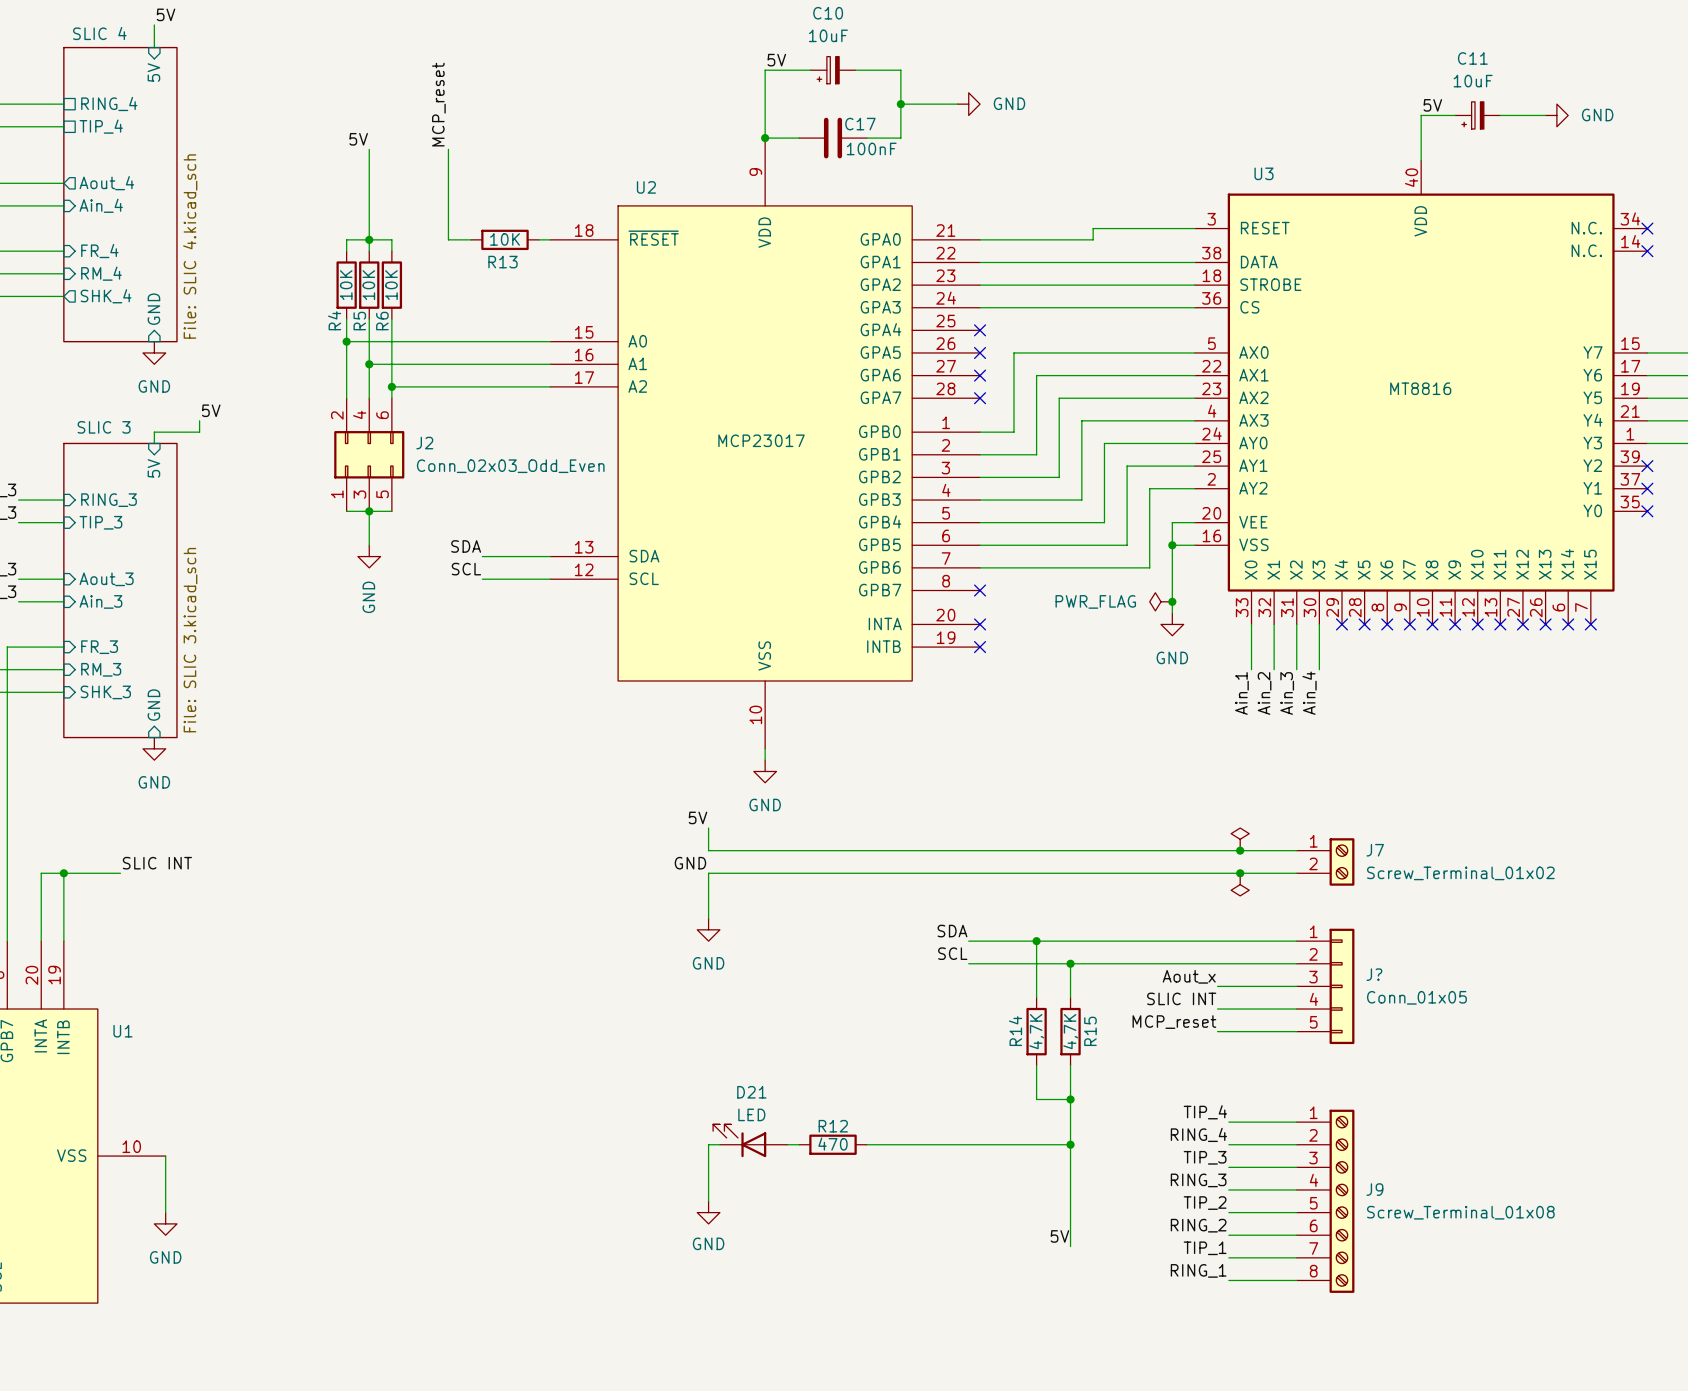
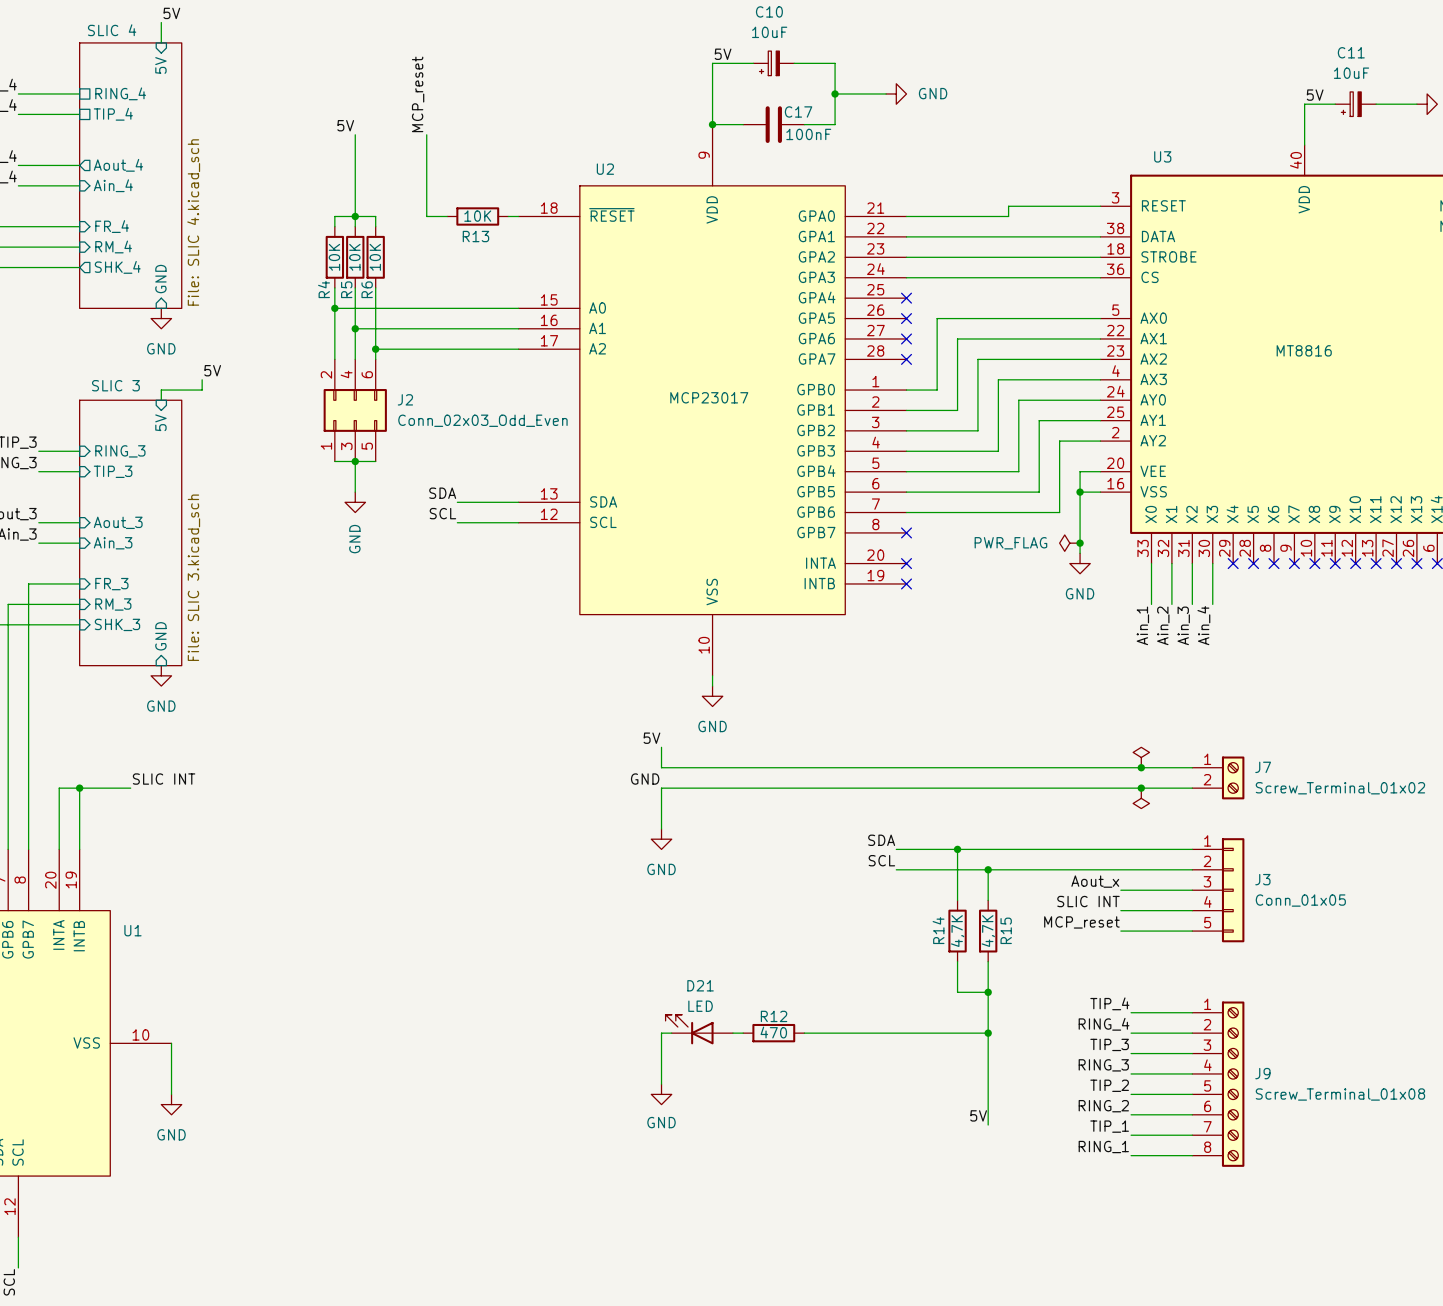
J? name: J? (1374, 974) -> J3 (1262, 879)

